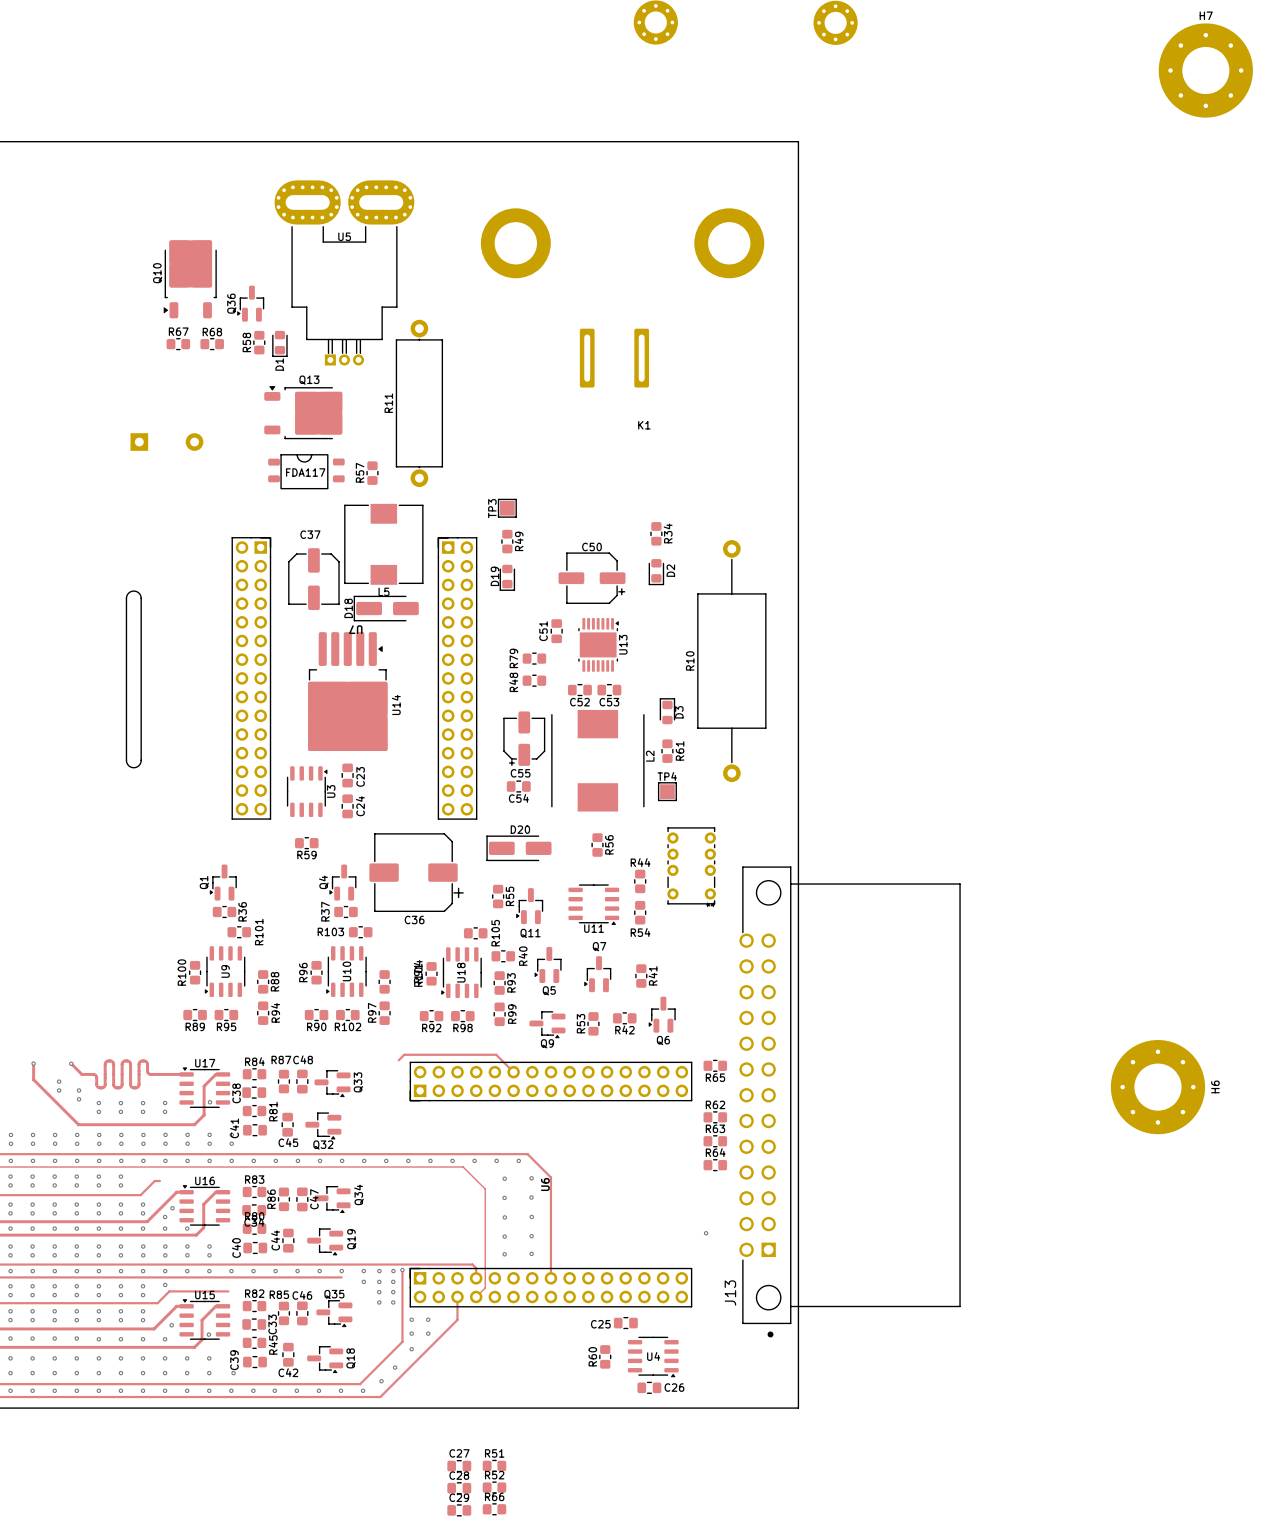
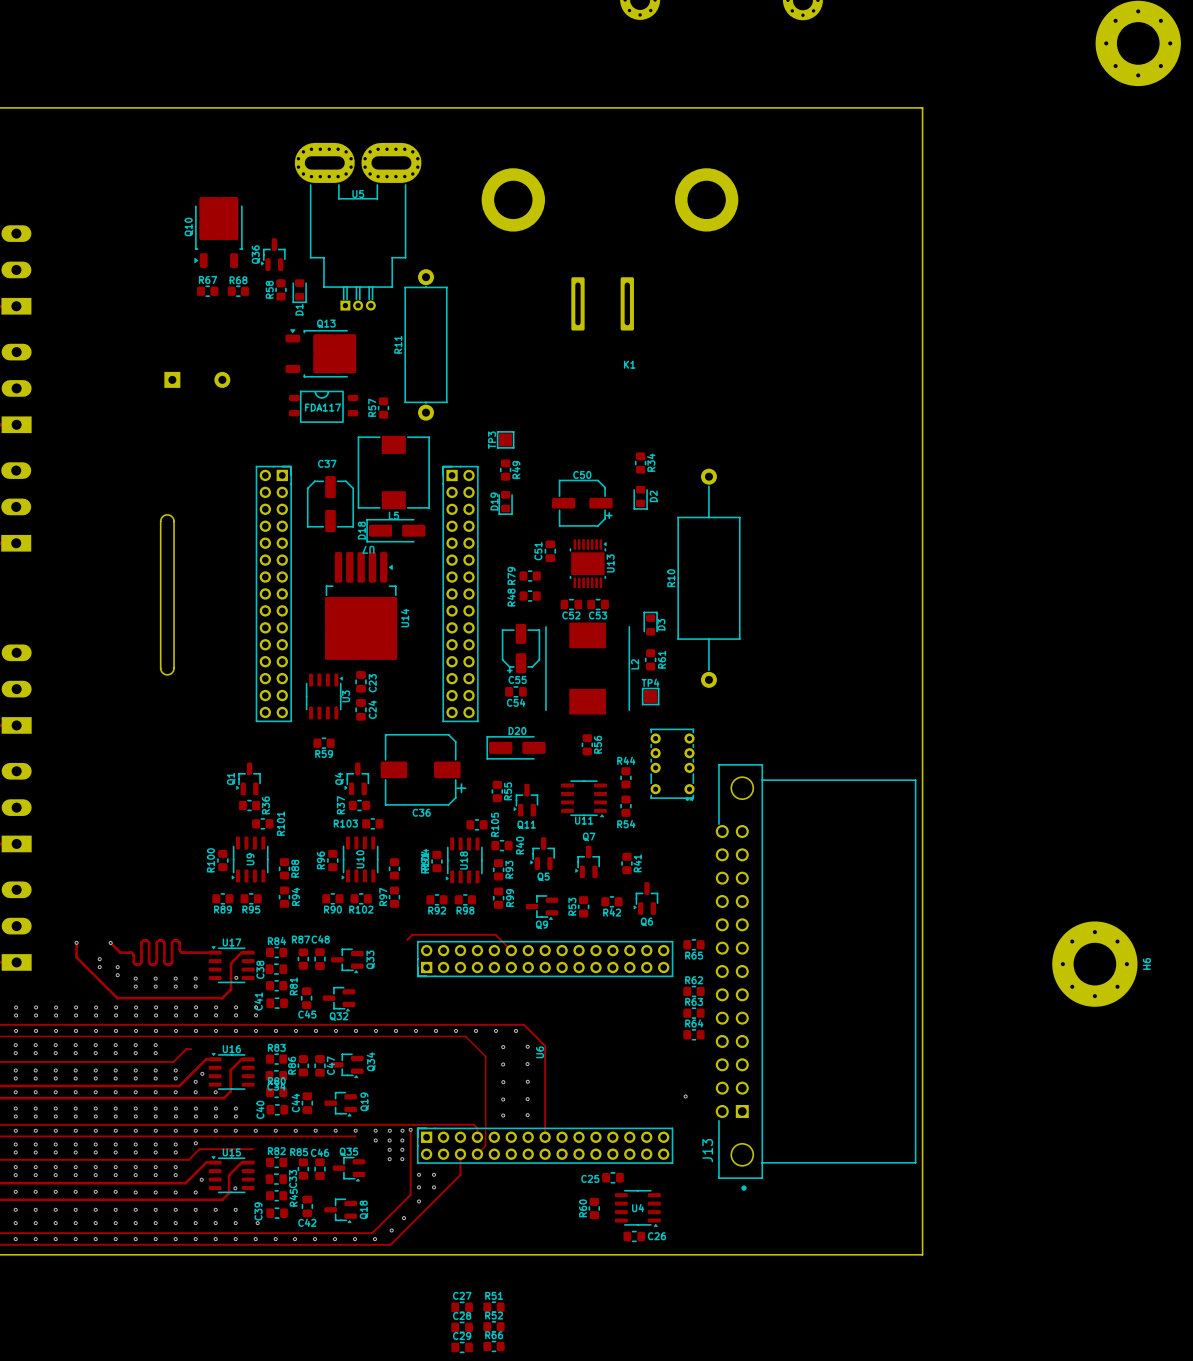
board edge: (798, 141) (798, 1408) -> (769, 107) (922, 107) (922, 1254) (769, 1254)

